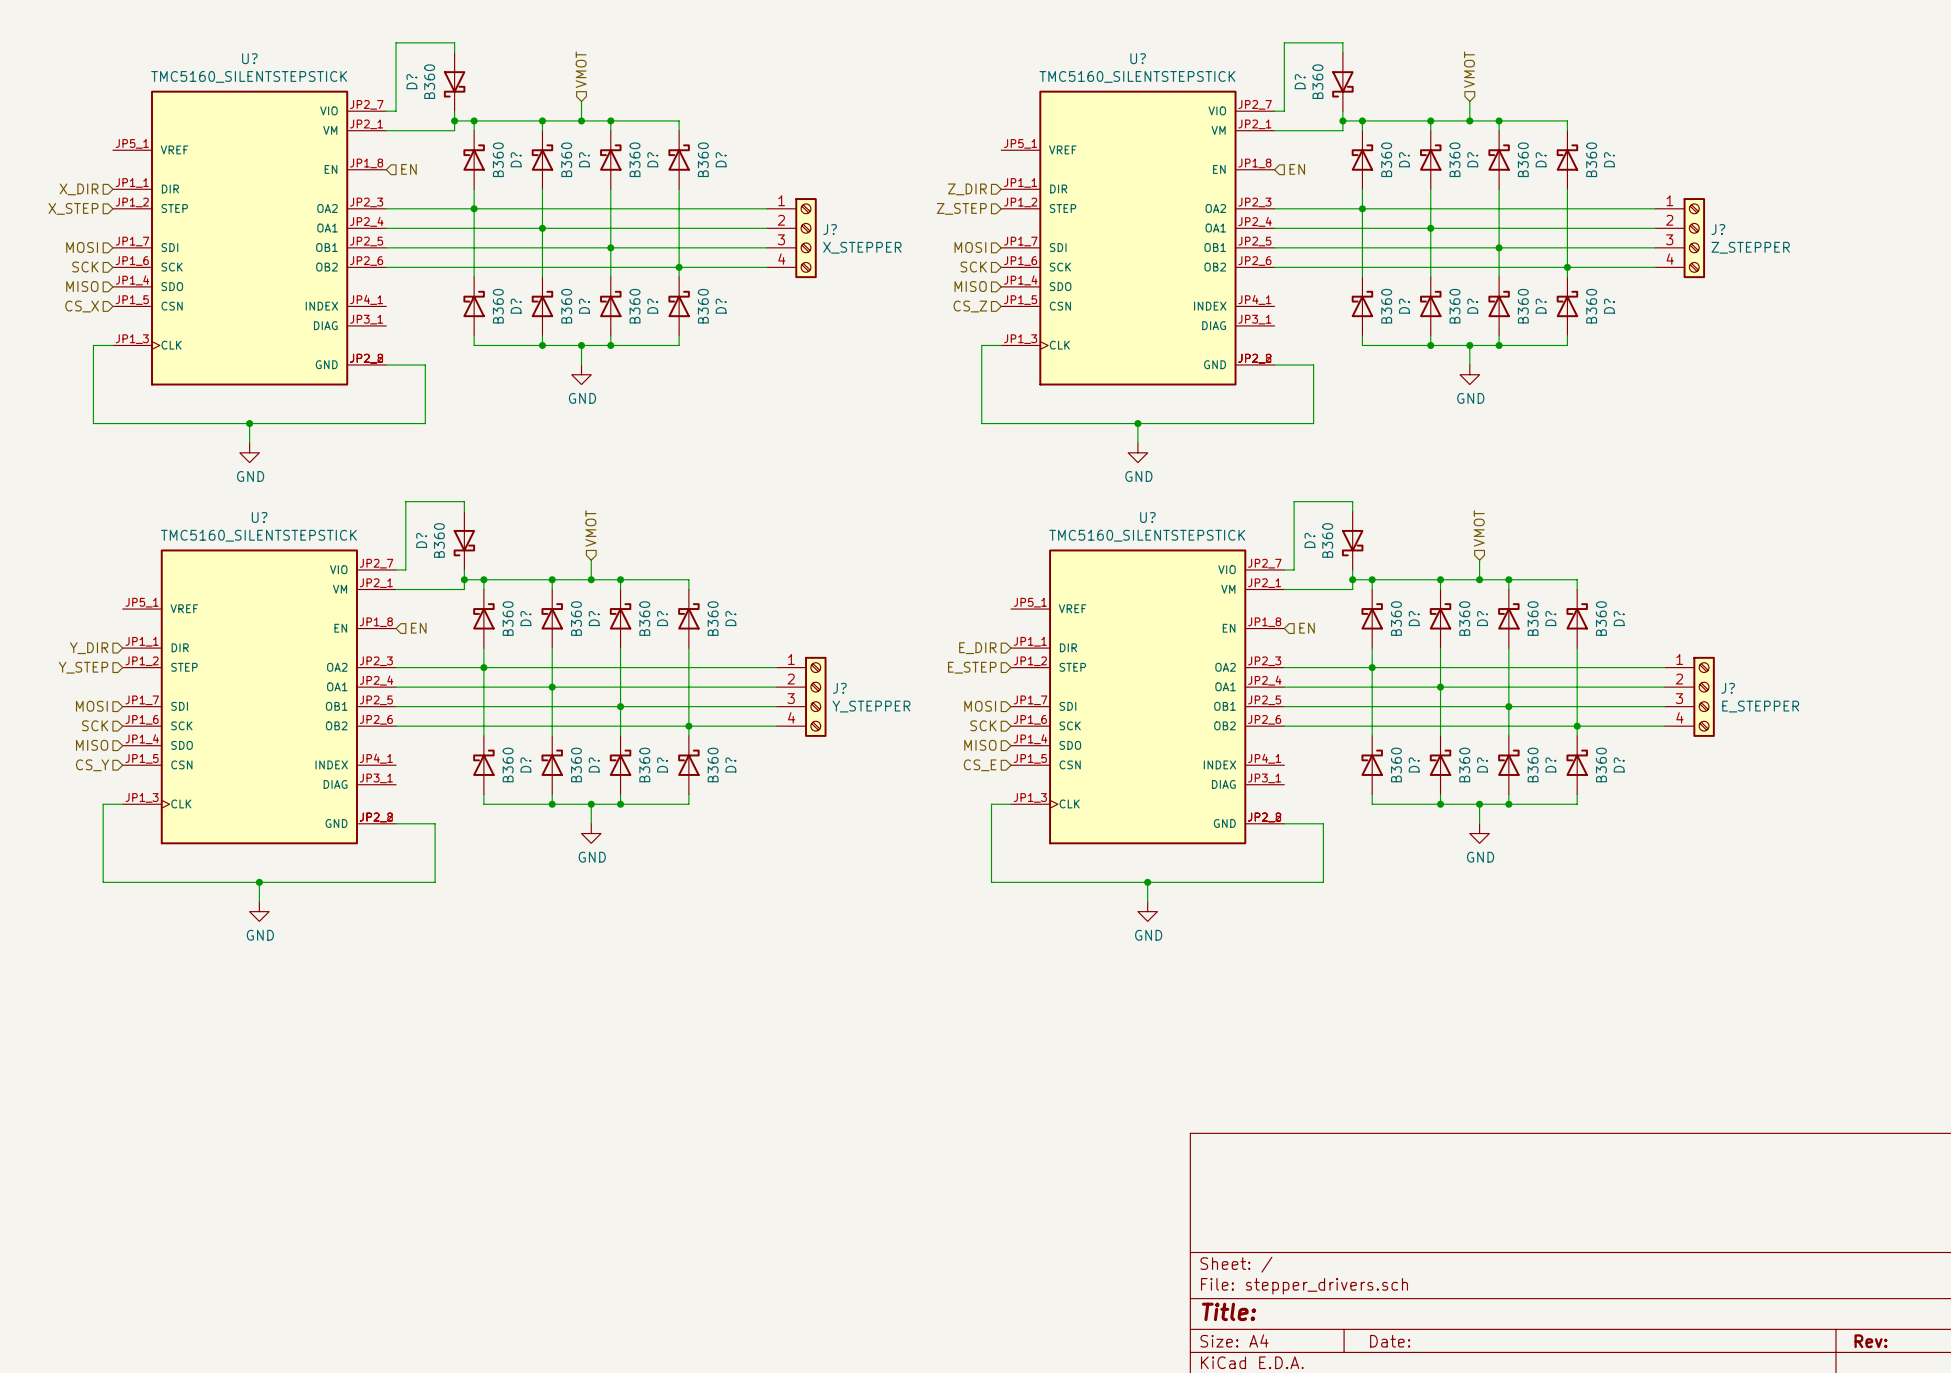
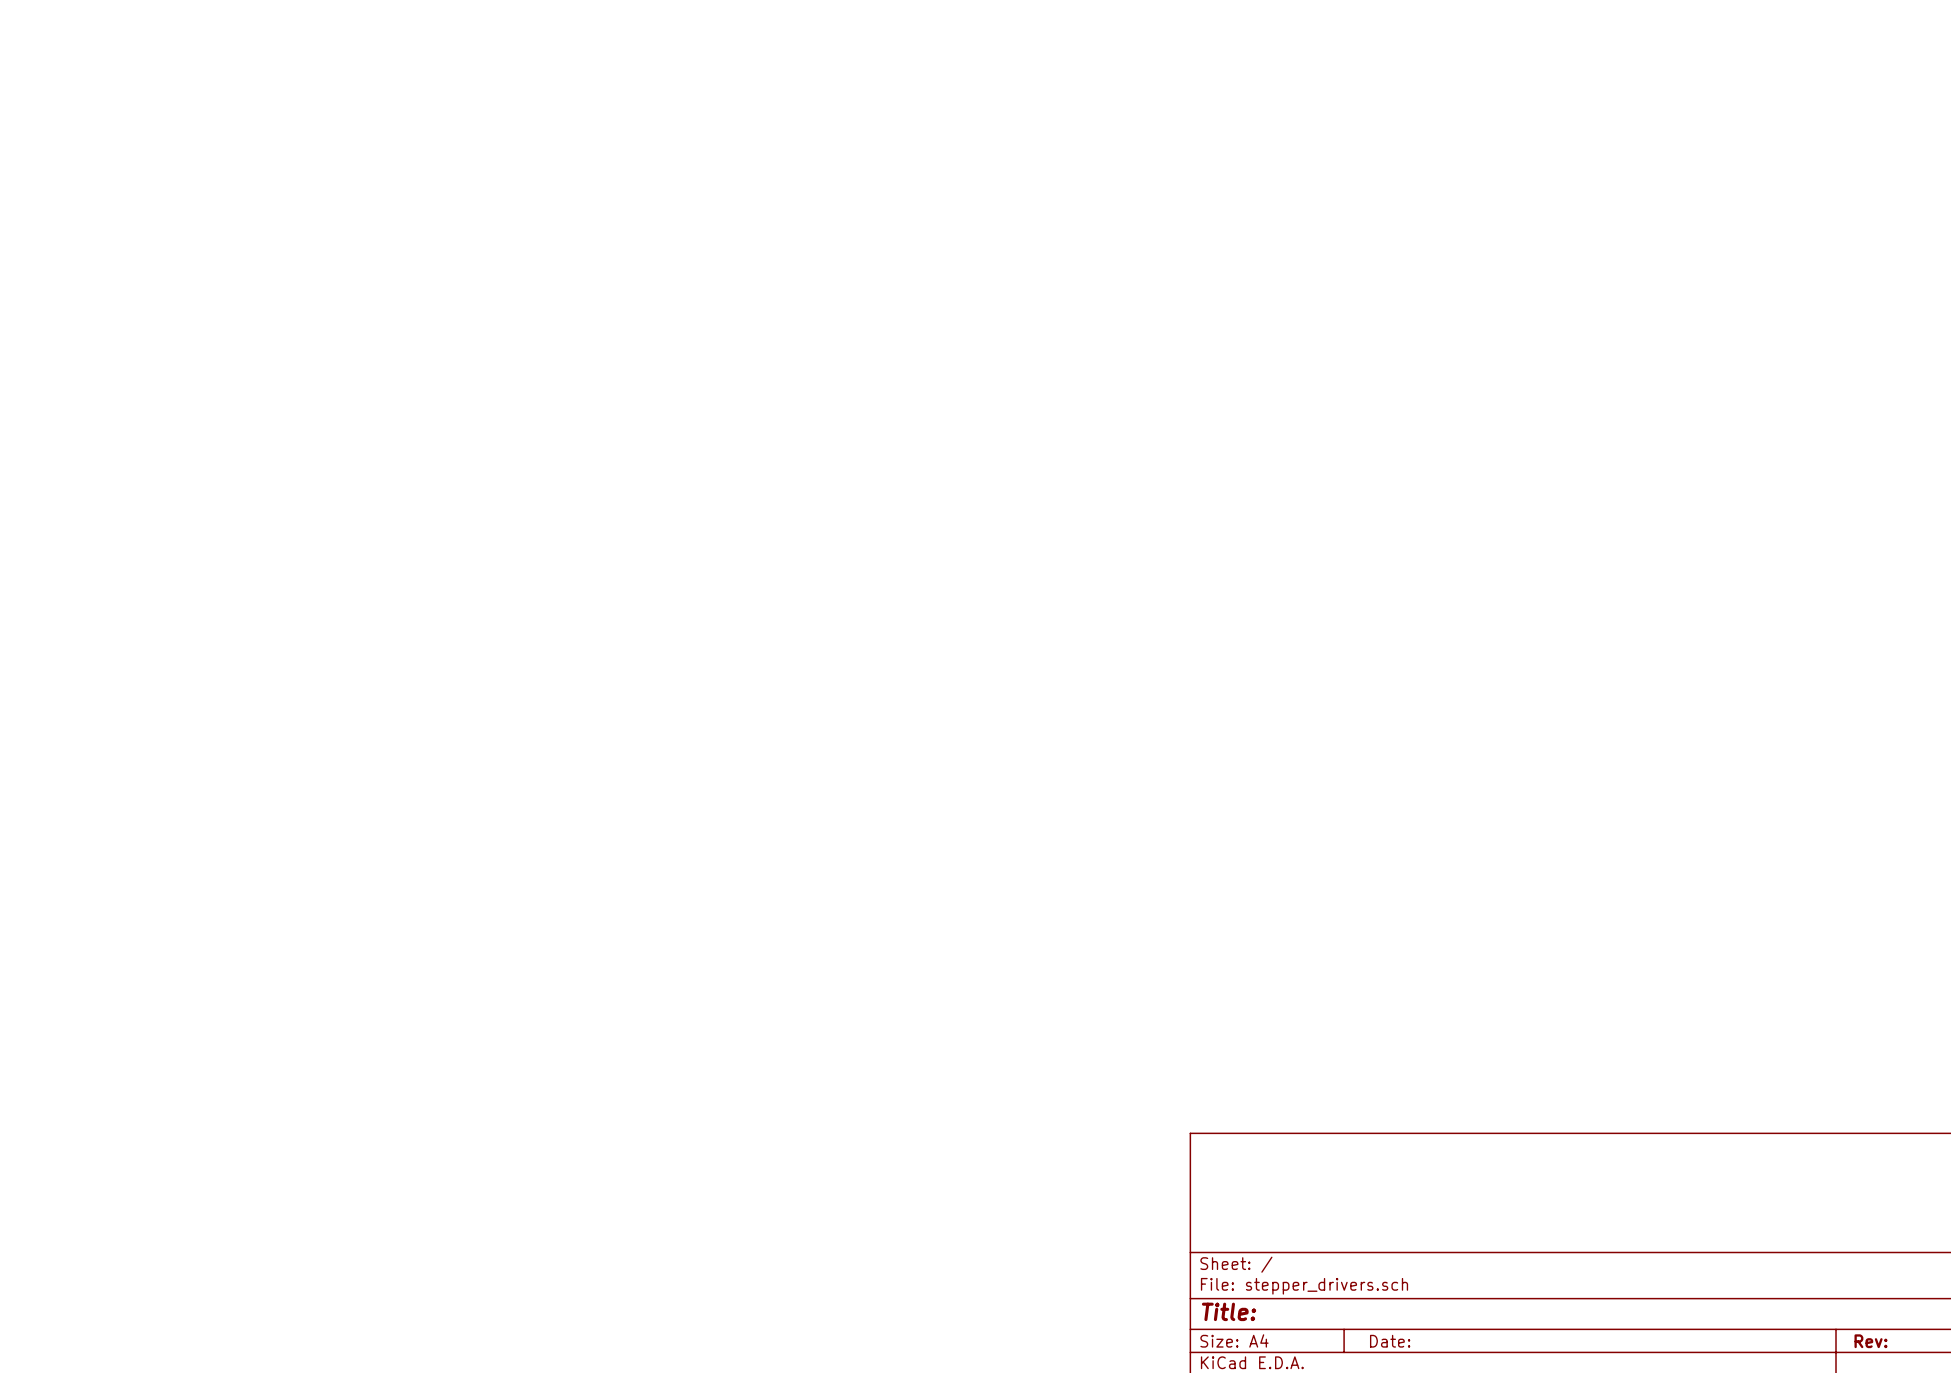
wire: (454, 52) (454, 42) (396, 42) (396, 111) (386, 111) -> none
wire: (1342, 52) (1342, 42) (1284, 42) (1284, 111) (1274, 111) -> none
hierarchical label: VMOT (581, 69) -> none
hierarchical label: VMOT (1469, 69) -> none
D?: B360 (454, 81) -> none
D?: B360 (1342, 81) -> none
wire: (581, 101) (581, 120) -> none
wire: (1469, 101) (1469, 120) -> none
wire: (454, 111) (454, 130) (386, 130) -> none
wire: (1342, 111) (1342, 130) (1274, 130) -> none
wire: (454, 120) (679, 120) (679, 130) -> none
junction: (454, 120) -> none
wire: (474, 120) (474, 130) -> none
junction: (474, 120) -> none
wire: (542, 120) (542, 130) -> none
junction: (542, 120) -> none
junction: (581, 120) -> none
wire: (610, 120) (610, 130) -> none
junction: (610, 120) -> none
wire: (1342, 120) (1567, 120) (1567, 130) -> none
junction: (1342, 120) -> none
wire: (1362, 120) (1362, 130) -> none
junction: (1362, 120) -> none
wire: (1430, 120) (1430, 130) -> none
junction: (1430, 120) -> none
junction: (1469, 120) -> none
wire: (1499, 120) (1499, 130) -> none
junction: (1499, 120) -> none
D?: B360 (474, 159) -> none
D?: B360 (542, 159) -> none
D?: B360 (610, 159) -> none
D?: B360 (679, 159) -> none
D?: B360 (1362, 159) -> none
D?: B360 (1430, 159) -> none
D?: B360 (1499, 159) -> none
D?: B360 (1567, 159) -> none
hierarchical label: EN (408, 169) -> none
hierarchical label: EN (1297, 169) -> none
hierarchical label: X_DIR (79, 189) -> none
wire: (474, 189) (474, 277) -> none
wire: (542, 189) (542, 277) -> none
wire: (610, 189) (610, 277) -> none
wire: (679, 189) (679, 277) -> none
hierarchical label: Z_DIR (967, 189) -> none
wire: (1362, 189) (1362, 277) -> none
wire: (1430, 189) (1430, 277) -> none
wire: (1499, 189) (1499, 277) -> none
wire: (1567, 189) (1567, 277) -> none
hierarchical label: X_STEP (73, 208) -> none
wire: (386, 208) (766, 208) -> none
junction: (474, 208) -> none
hierarchical label: Z_STEP (961, 208) -> none
wire: (1274, 208) (1655, 208) -> none
junction: (1362, 208) -> none
wire: (386, 228) (766, 228) -> none
junction: (542, 228) -> none
wire: (1274, 228) (1655, 228) -> none
junction: (1430, 228) -> none
U?: TMC5160_SILENTSTEPSTICK (249, 238) -> none
J?: X_STEPPER (791, 238) -> none
U?: TMC5160_SILENTSTEPSTICK (1137, 238) -> none
J?: Z_STEPPER (1680, 238) -> none
hierarchical label: MOSI (82, 247) -> none
wire: (386, 247) (766, 247) -> none
junction: (610, 247) -> none
hierarchical label: MOSI (970, 247) -> none
wire: (1274, 247) (1655, 247) -> none
junction: (1499, 247) -> none
hierarchical label: SCK (85, 267) -> none
wire: (386, 267) (766, 267) -> none
junction: (679, 267) -> none
hierarchical label: SCK (973, 267) -> none
wire: (1274, 267) (1655, 267) -> none
junction: (1567, 267) -> none
hierarchical label: MISO (82, 286) -> none
hierarchical label: MISO (970, 286) -> none
hierarchical label: CS_X (82, 306) -> none
D?: B360 (474, 306) -> none
D?: B360 (542, 306) -> none
D?: B360 (610, 306) -> none
D?: B360 (679, 306) -> none
hierarchical label: CS_Z (970, 306) -> none
D?: B360 (1362, 306) -> none
D?: B360 (1430, 306) -> none
D?: B360 (1499, 306) -> none
D?: B360 (1567, 306) -> none
wire: (474, 335) (474, 345) (679, 345) (679, 335) -> none
wire: (542, 335) (542, 345) -> none
wire: (610, 335) (610, 345) -> none
wire: (1362, 335) (1362, 345) (1567, 345) (1567, 335) -> none
wire: (1430, 335) (1430, 345) -> none
wire: (1499, 335) (1499, 345) -> none
wire: (112, 345) (93, 345) (93, 423) (425, 423) (425, 364) (386, 364) -> none
junction: (542, 345) -> none
wire: (581, 345) (581, 364) -> none
junction: (581, 345) -> none
junction: (610, 345) -> none
wire: (1001, 345) (981, 345) (981, 423) (1313, 423) (1313, 364) (1274, 364) -> none
junction: (1430, 345) -> none
wire: (1469, 345) (1469, 364) -> none
junction: (1469, 345) -> none
junction: (1499, 345) -> none
power symbol: GND (581, 374) -> none
power symbol: GND (1469, 374) -> none
wire: (249, 423) (249, 443) -> none
junction: (249, 423) -> none
wire: (1137, 423) (1137, 443) -> none
junction: (1137, 423) -> none
power symbol: GND (249, 452) -> none
power symbol: GND (1137, 452) -> none
wire: (464, 511) (464, 501) (405, 501) (405, 569) (396, 569) -> none
wire: (1352, 511) (1352, 501) (1294, 501) (1294, 569) (1284, 569) -> none
hierarchical label: VMOT (590, 528) -> none
hierarchical label: VMOT (1479, 528) -> none
D?: B360 (464, 540) -> none
D?: B360 (1352, 540) -> none
wire: (591, 560) (591, 579) -> none
wire: (1479, 560) (1479, 579) -> none
wire: (464, 569) (464, 589) (396, 589) -> none
wire: (1352, 569) (1352, 589) (1284, 589) -> none
wire: (464, 579) (688, 579) (688, 589) -> none
junction: (464, 579) -> none
wire: (483, 579) (483, 589) -> none
junction: (483, 579) -> none
wire: (552, 579) (552, 589) -> none
junction: (552, 579) -> none
junction: (591, 579) -> none
wire: (620, 579) (620, 589) -> none
junction: (620, 579) -> none
wire: (1352, 579) (1577, 579) (1577, 589) -> none
junction: (1352, 579) -> none
wire: (1372, 579) (1372, 589) -> none
junction: (1372, 579) -> none
wire: (1440, 579) (1440, 589) -> none
junction: (1440, 579) -> none
junction: (1479, 579) -> none
wire: (1508, 579) (1508, 589) -> none
junction: (1508, 579) -> none
D?: B360 (483, 618) -> none
D?: B360 (552, 618) -> none
D?: B360 (620, 618) -> none
D?: B360 (688, 618) -> none
D?: B360 (1372, 618) -> none
D?: B360 (1440, 618) -> none
D?: B360 (1508, 618) -> none
D?: B360 (1577, 618) -> none
hierarchical label: EN (418, 628) -> none
hierarchical label: EN (1307, 628) -> none
hierarchical label: Y_DIR (89, 648) -> none
wire: (483, 648) (483, 735) -> none
wire: (552, 648) (552, 735) -> none
wire: (620, 648) (620, 735) -> none
wire: (688, 648) (688, 735) -> none
hierarchical label: E_DIR (977, 648) -> none
wire: (1372, 648) (1372, 735) -> none
wire: (1440, 648) (1440, 735) -> none
wire: (1508, 648) (1508, 735) -> none
wire: (1577, 648) (1577, 735) -> none
hierarchical label: Y_STEP (83, 667) -> none
wire: (396, 667) (776, 667) -> none
junction: (483, 667) -> none
hierarchical label: E_STEP (972, 667) -> none
wire: (1284, 667) (1665, 667) -> none
junction: (1372, 667) -> none
wire: (396, 687) (776, 687) -> none
junction: (552, 687) -> none
wire: (1284, 687) (1665, 687) -> none
junction: (1440, 687) -> none
U?: TMC5160_SILENTSTEPSTICK (259, 696) -> none
J?: Y_STEPPER (801, 696) -> none
U?: TMC5160_SILENTSTEPSTICK (1147, 696) -> none
J?: E_STEPPER (1689, 696) -> none
hierarchical label: MOSI (91, 706) -> none
wire: (396, 706) (776, 706) -> none
junction: (620, 706) -> none
hierarchical label: MOSI (980, 706) -> none
wire: (1284, 706) (1665, 706) -> none
junction: (1508, 706) -> none
hierarchical label: SCK (95, 725) -> none
hierarchical label: SCK (983, 725) -> none
wire: (396, 726) (776, 726) -> none
junction: (688, 726) -> none
wire: (1284, 726) (1665, 726) -> none
junction: (1577, 726) -> none
hierarchical label: MISO (92, 745) -> none
hierarchical label: MISO (980, 745) -> none
hierarchical label: CS_Y (92, 765) -> none
D?: B360 (483, 765) -> none
D?: B360 (552, 765) -> none
D?: B360 (620, 765) -> none
D?: B360 (688, 765) -> none
hierarchical label: CS_E (980, 765) -> none
D?: B360 (1372, 765) -> none
D?: B360 (1440, 765) -> none
D?: B360 (1508, 765) -> none
D?: B360 (1577, 765) -> none
wire: (483, 794) (483, 804) (688, 804) (688, 794) -> none
wire: (552, 794) (552, 804) -> none
wire: (620, 794) (620, 804) -> none
wire: (1372, 794) (1372, 804) (1577, 804) (1577, 794) -> none
wire: (1440, 794) (1440, 804) -> none
wire: (1508, 794) (1508, 804) -> none
wire: (122, 804) (103, 804) (103, 882) (435, 882) (435, 823) (396, 823) -> none
junction: (552, 804) -> none
wire: (591, 804) (591, 823) -> none
junction: (591, 804) -> none
junction: (620, 804) -> none
wire: (1011, 804) (991, 804) (991, 882) (1323, 882) (1323, 823) (1284, 823) -> none
junction: (1440, 804) -> none
wire: (1479, 804) (1479, 823) -> none
junction: (1479, 804) -> none
junction: (1508, 804) -> none
power symbol: GND (591, 833) -> none
power symbol: GND (1479, 833) -> none
wire: (259, 882) (259, 901) -> none
junction: (259, 882) -> none
wire: (1147, 882) (1147, 901) -> none
junction: (1147, 882) -> none
power symbol: GND (259, 911) -> none
power symbol: GND (1147, 911) -> none

